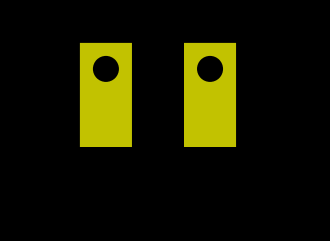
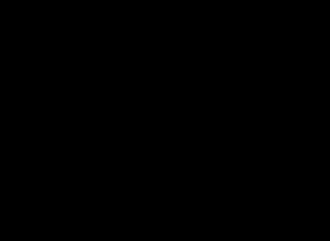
part: (105, 94) -> none
part: (210, 94) -> none

